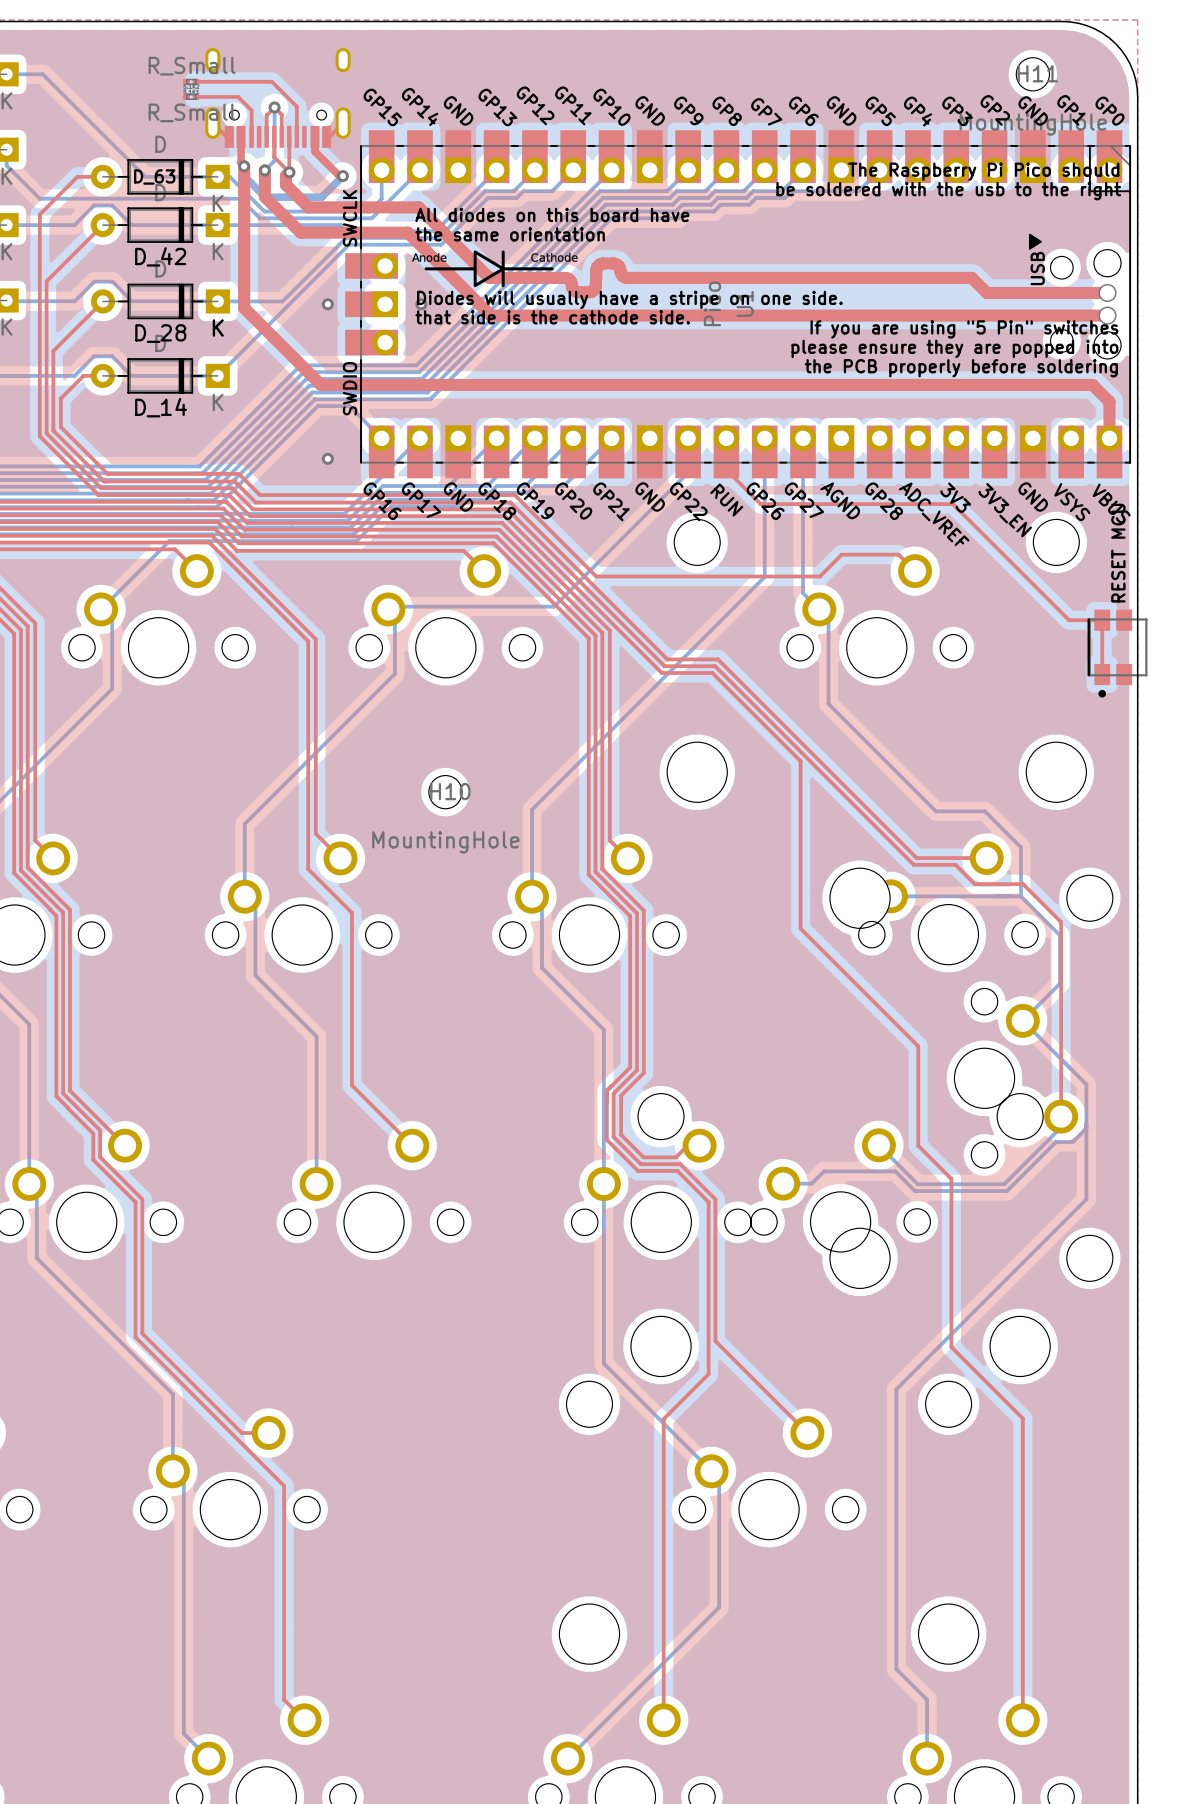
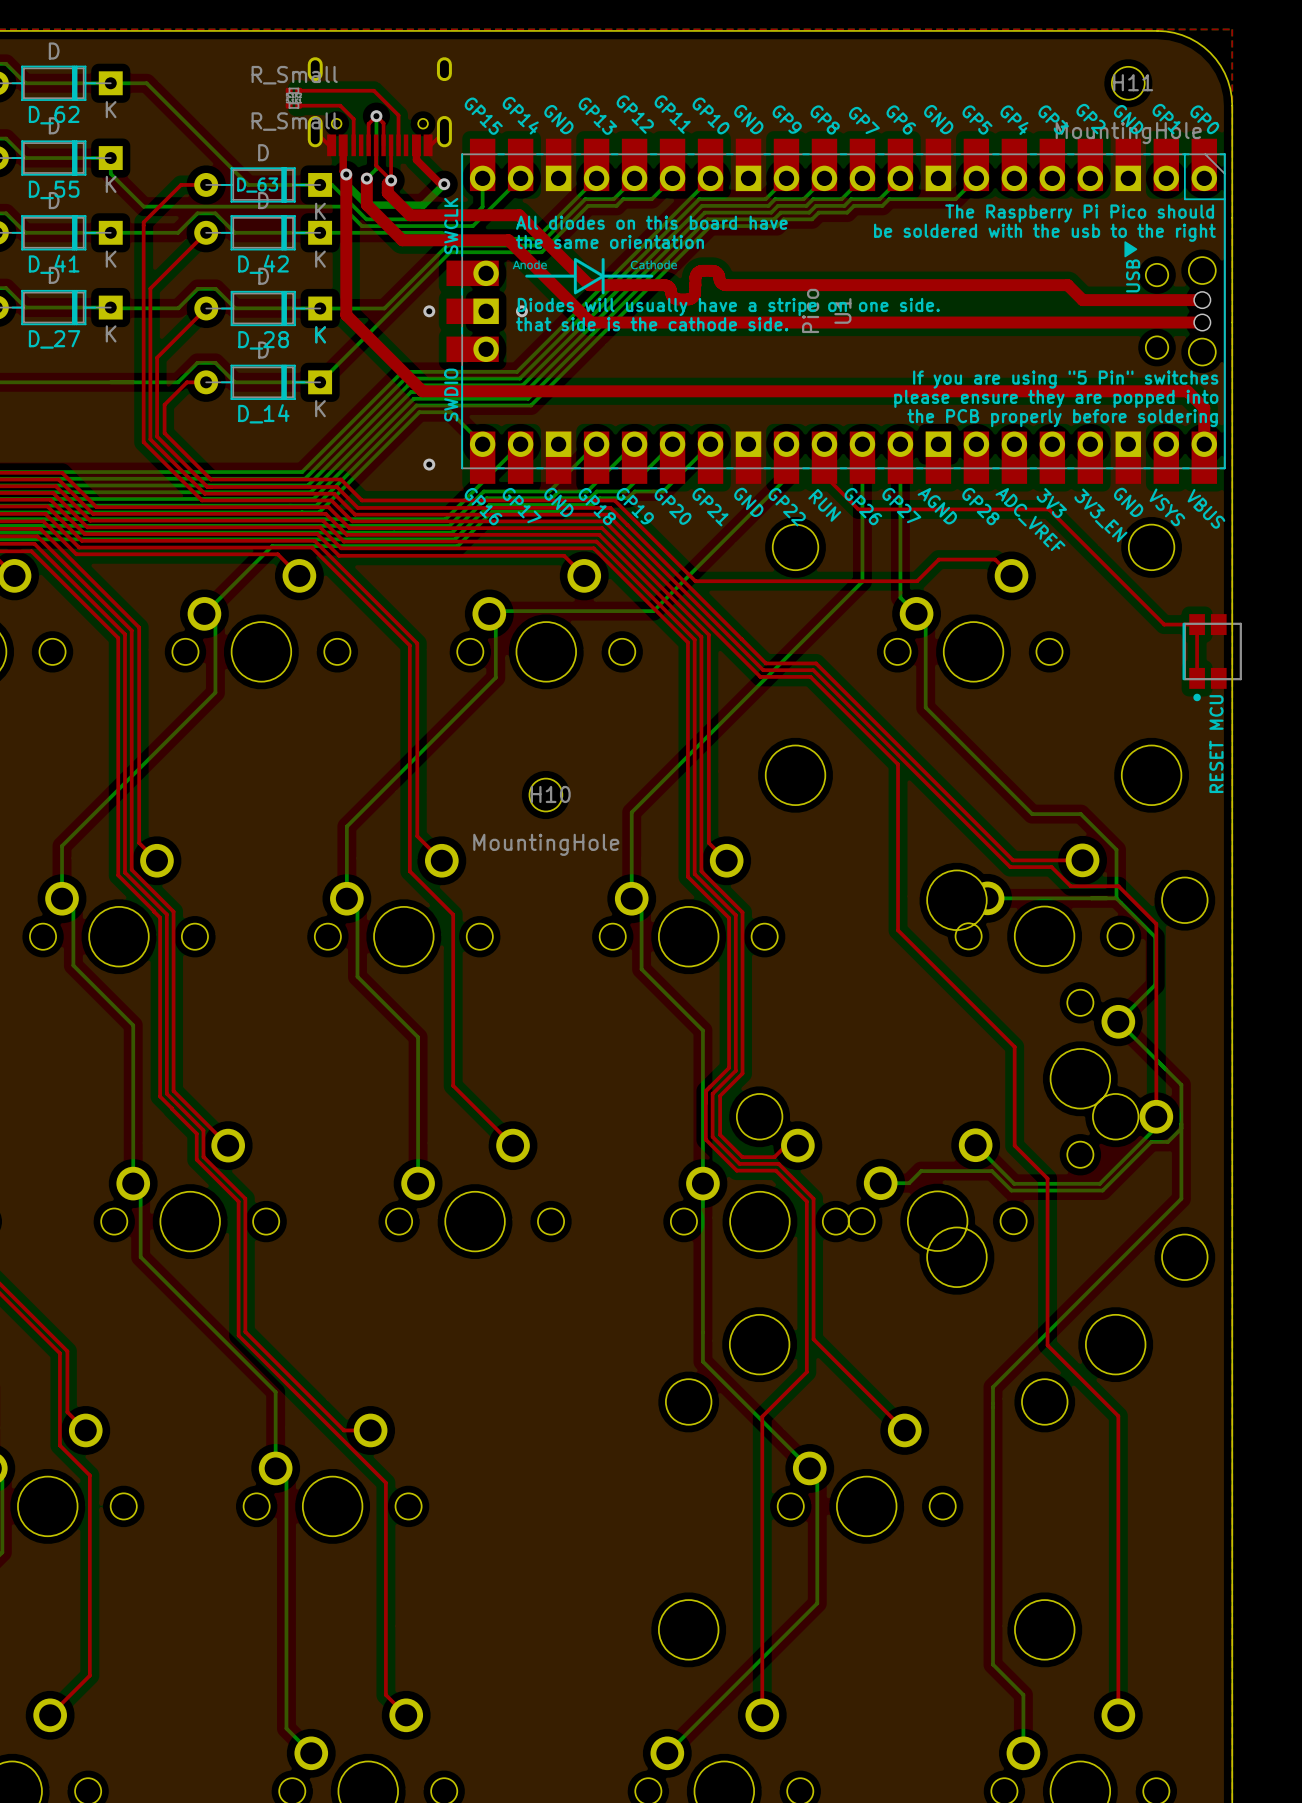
text: The Raspberry Pi Pico should (983, 171) -> none
text: be soldered with the usb to the right (948, 191) -> The Raspberry Pi Pico should (1079, 213)
text: none -> be soldered with the usb to the right (1044, 232)
text: If you are using "5 Pin" switches (964, 329) -> none
text position: please ensure they are popped into (954, 348) -> please ensure they are popped into (1056, 398)
text: the PCB properly before soldering (961, 368) -> If you are using "5 Pin" switches (1065, 379)
text: none -> the PCB properly before soldering (1062, 418)
text position: RESET MCU (1118, 553) -> RESET MCU (1216, 744)

